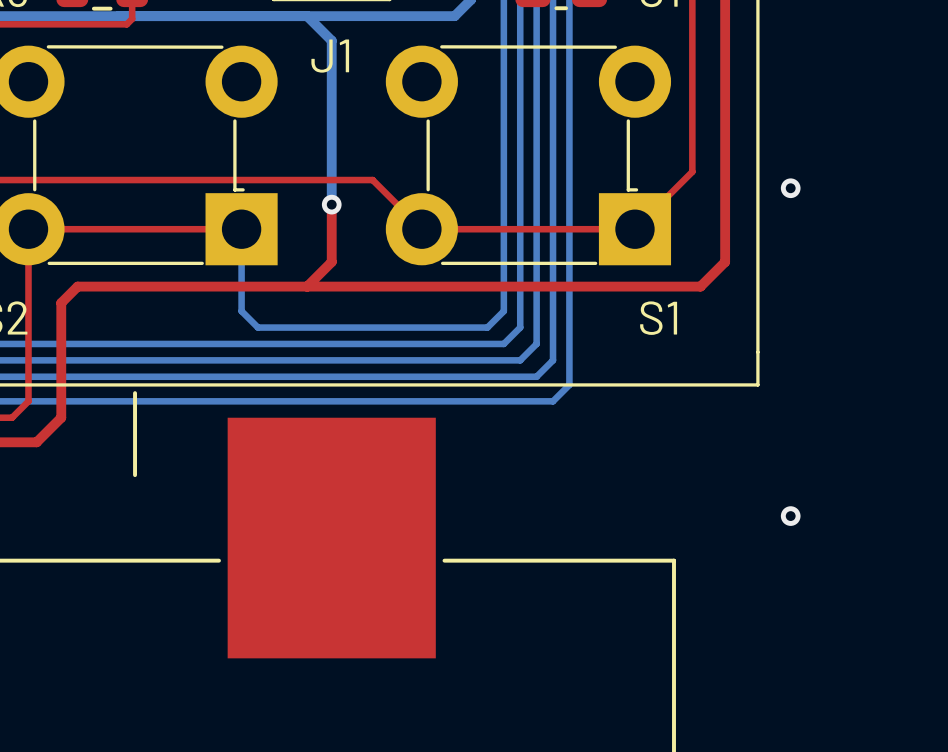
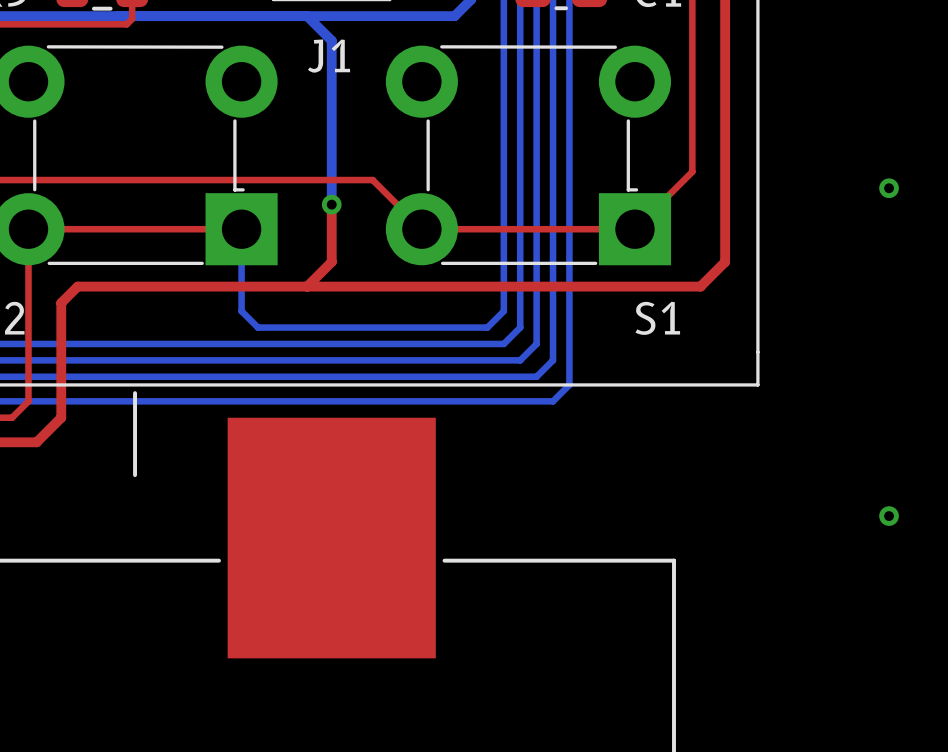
via position: (790, 188) -> (889, 188)
via position: (790, 516) -> (889, 516)

